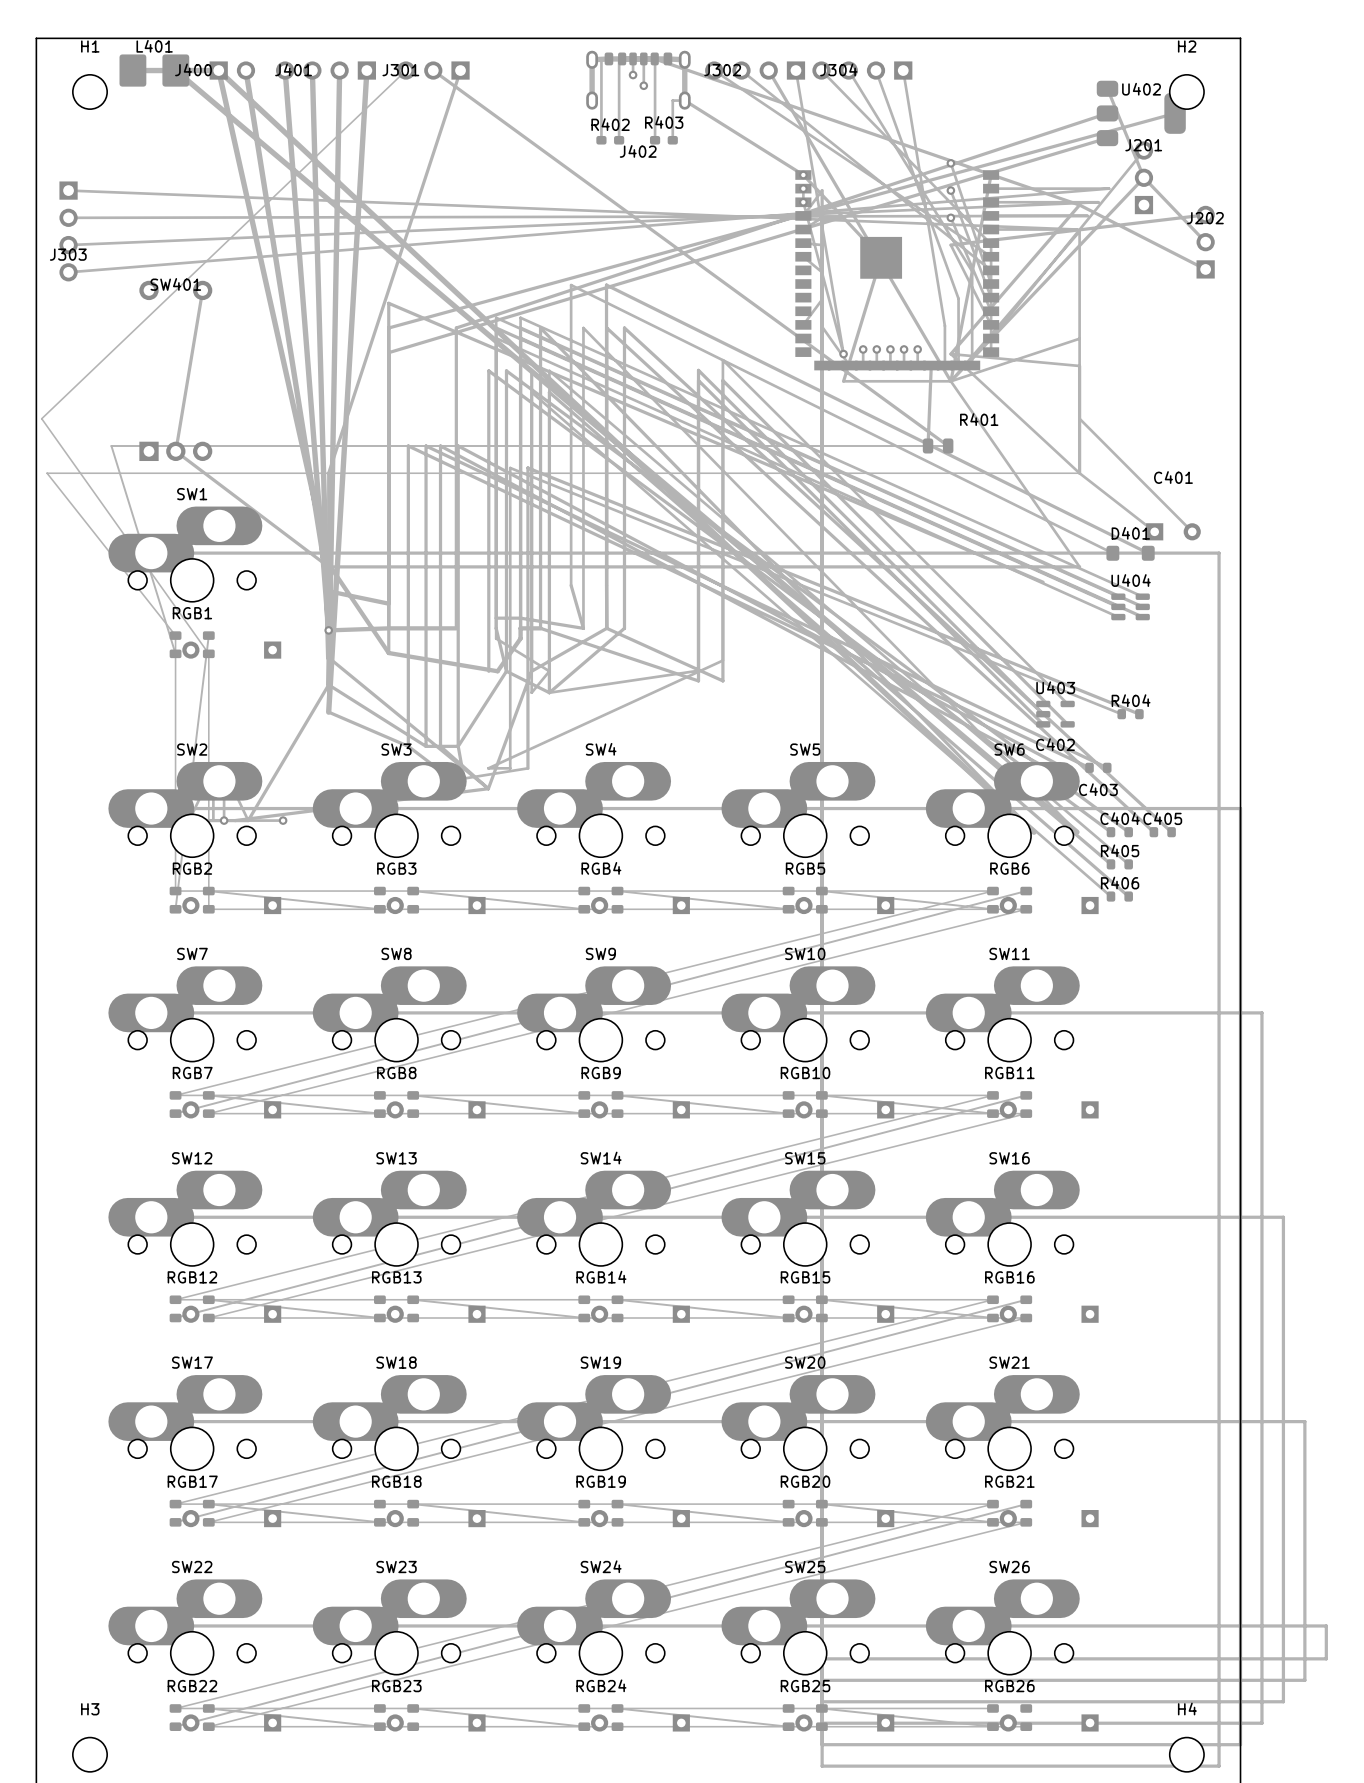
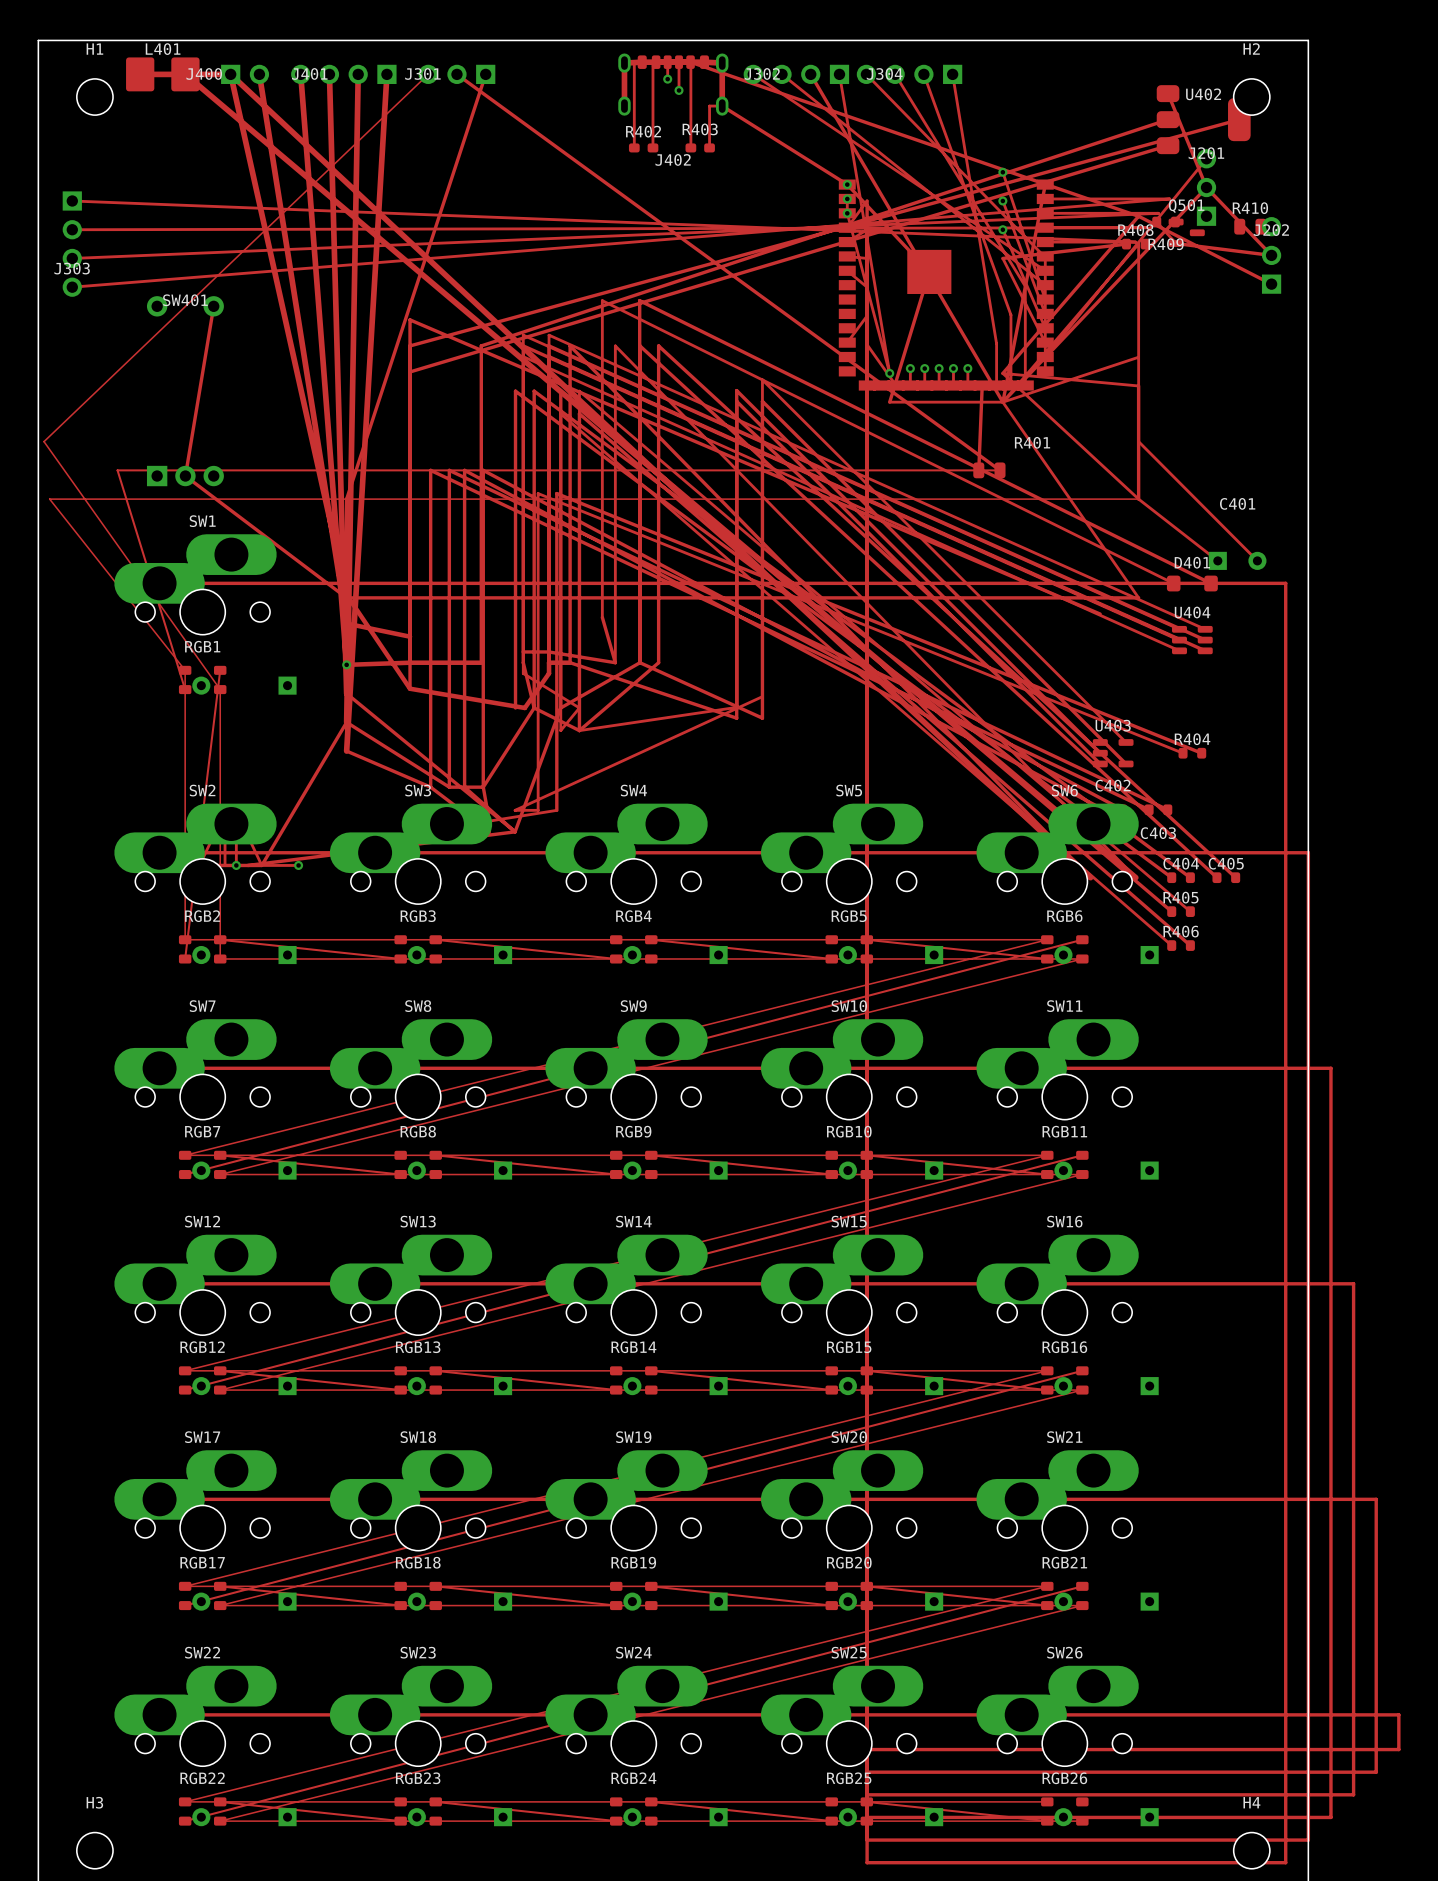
track: none -> (1156, 222) (1176, 243) (1271, 255)
R409: none -> (1166, 222)
R410: none -> (1250, 226)
track: (1205, 214) (950, 245) -> (1126, 244) (1002, 258)
Q501: none -> (1186, 232)
R408: none -> (1135, 244)

